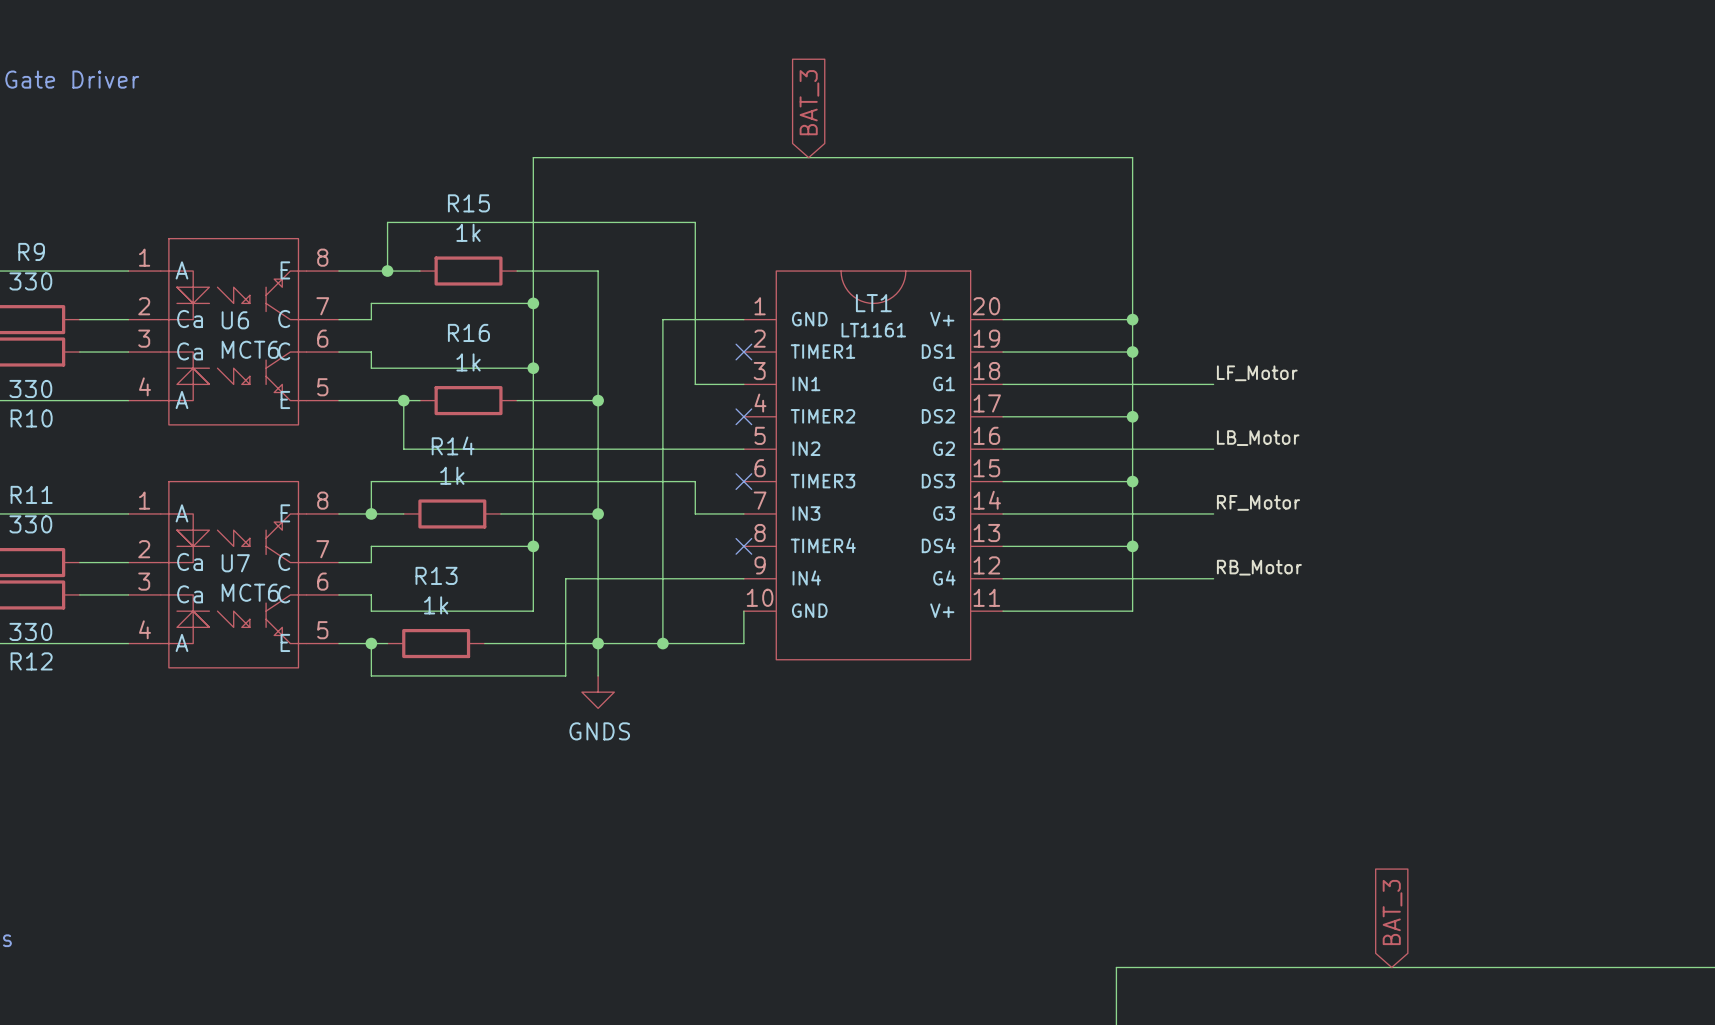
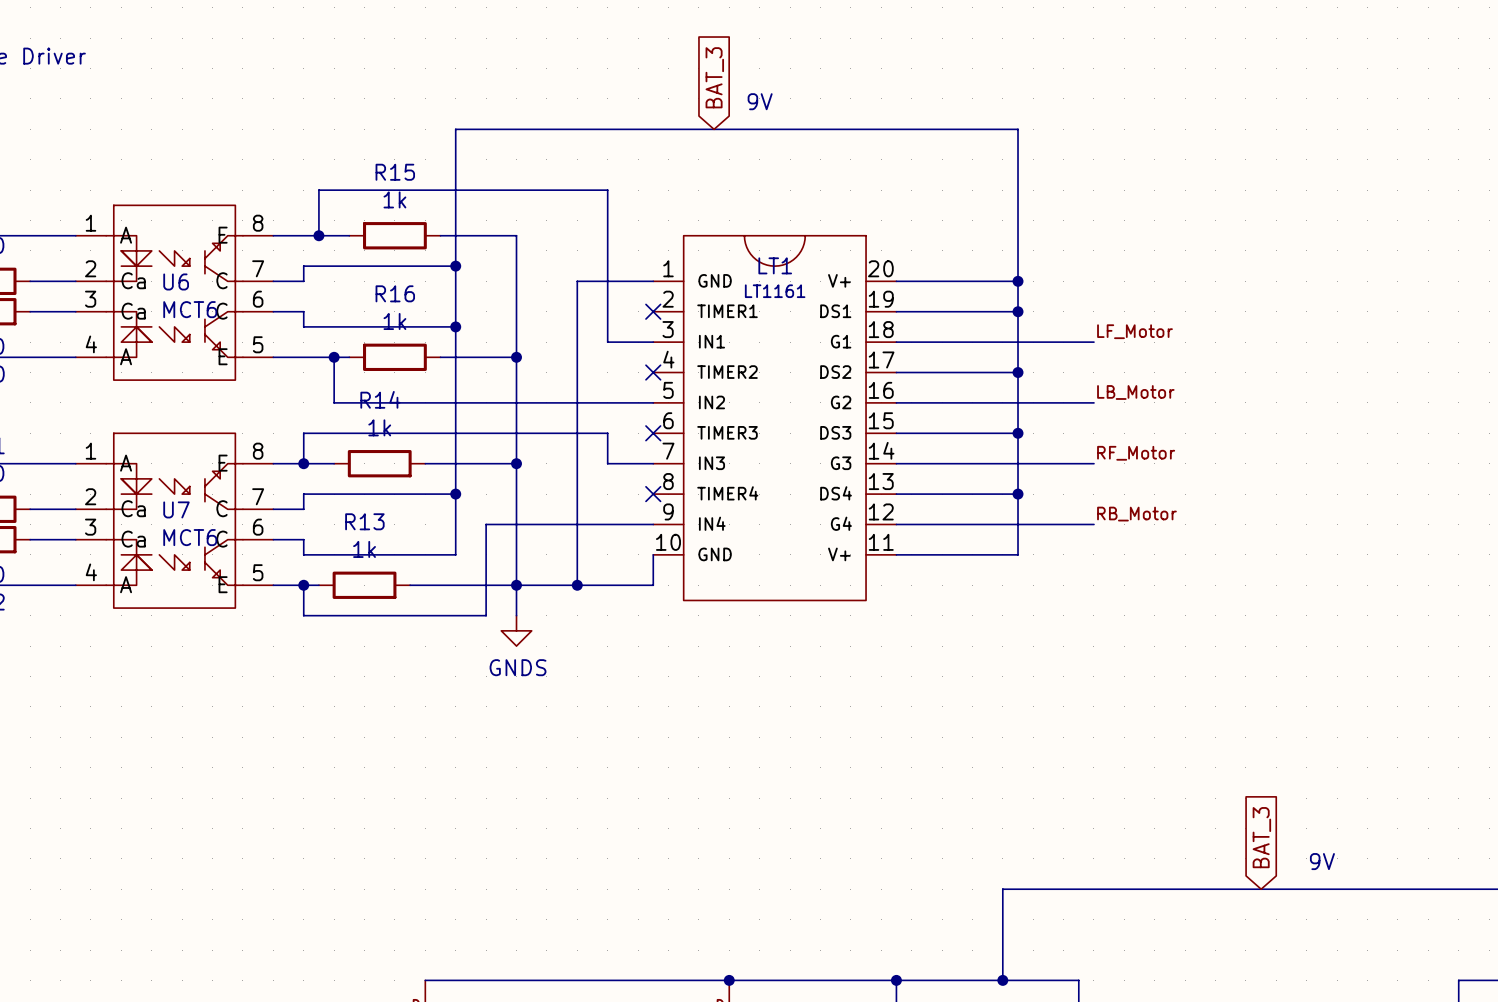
text: none -> 9V (760, 101)
text: none -> 9V (1322, 861)

